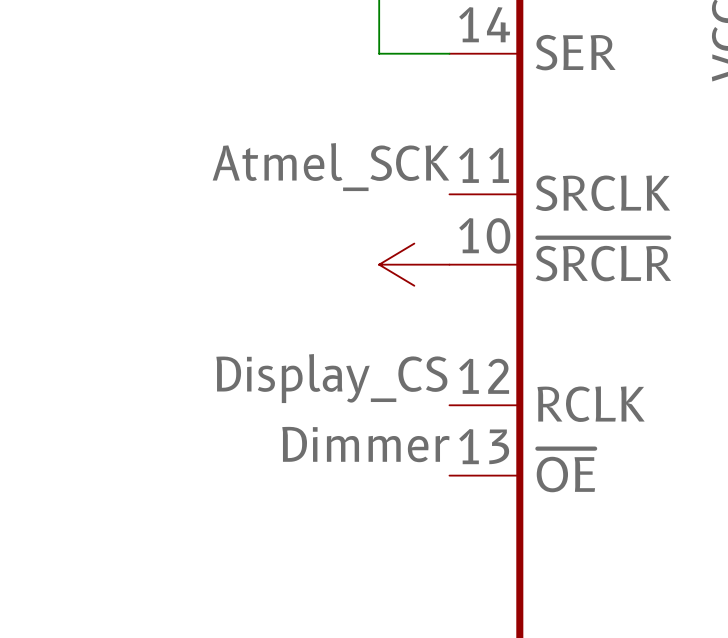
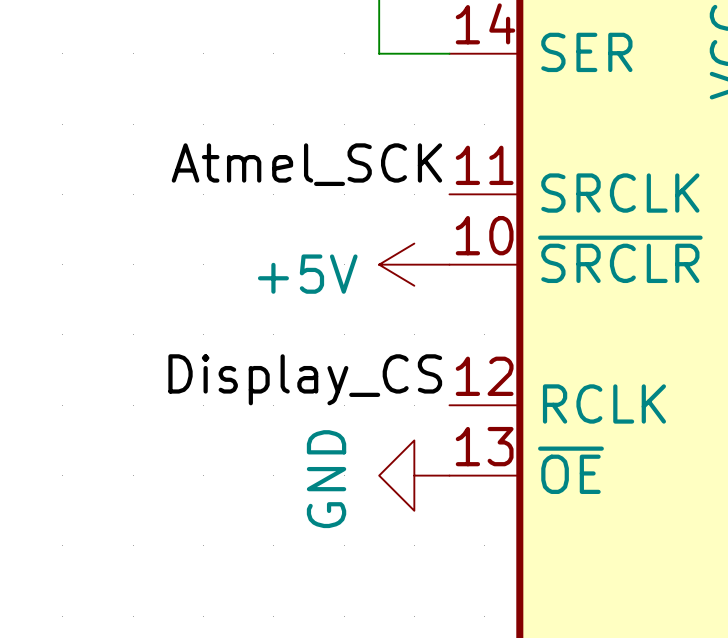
power symbol text: none -> +5V (307, 274)
label: Dimmer (365, 444) -> none
power symbol: none -> GND (414, 475)

